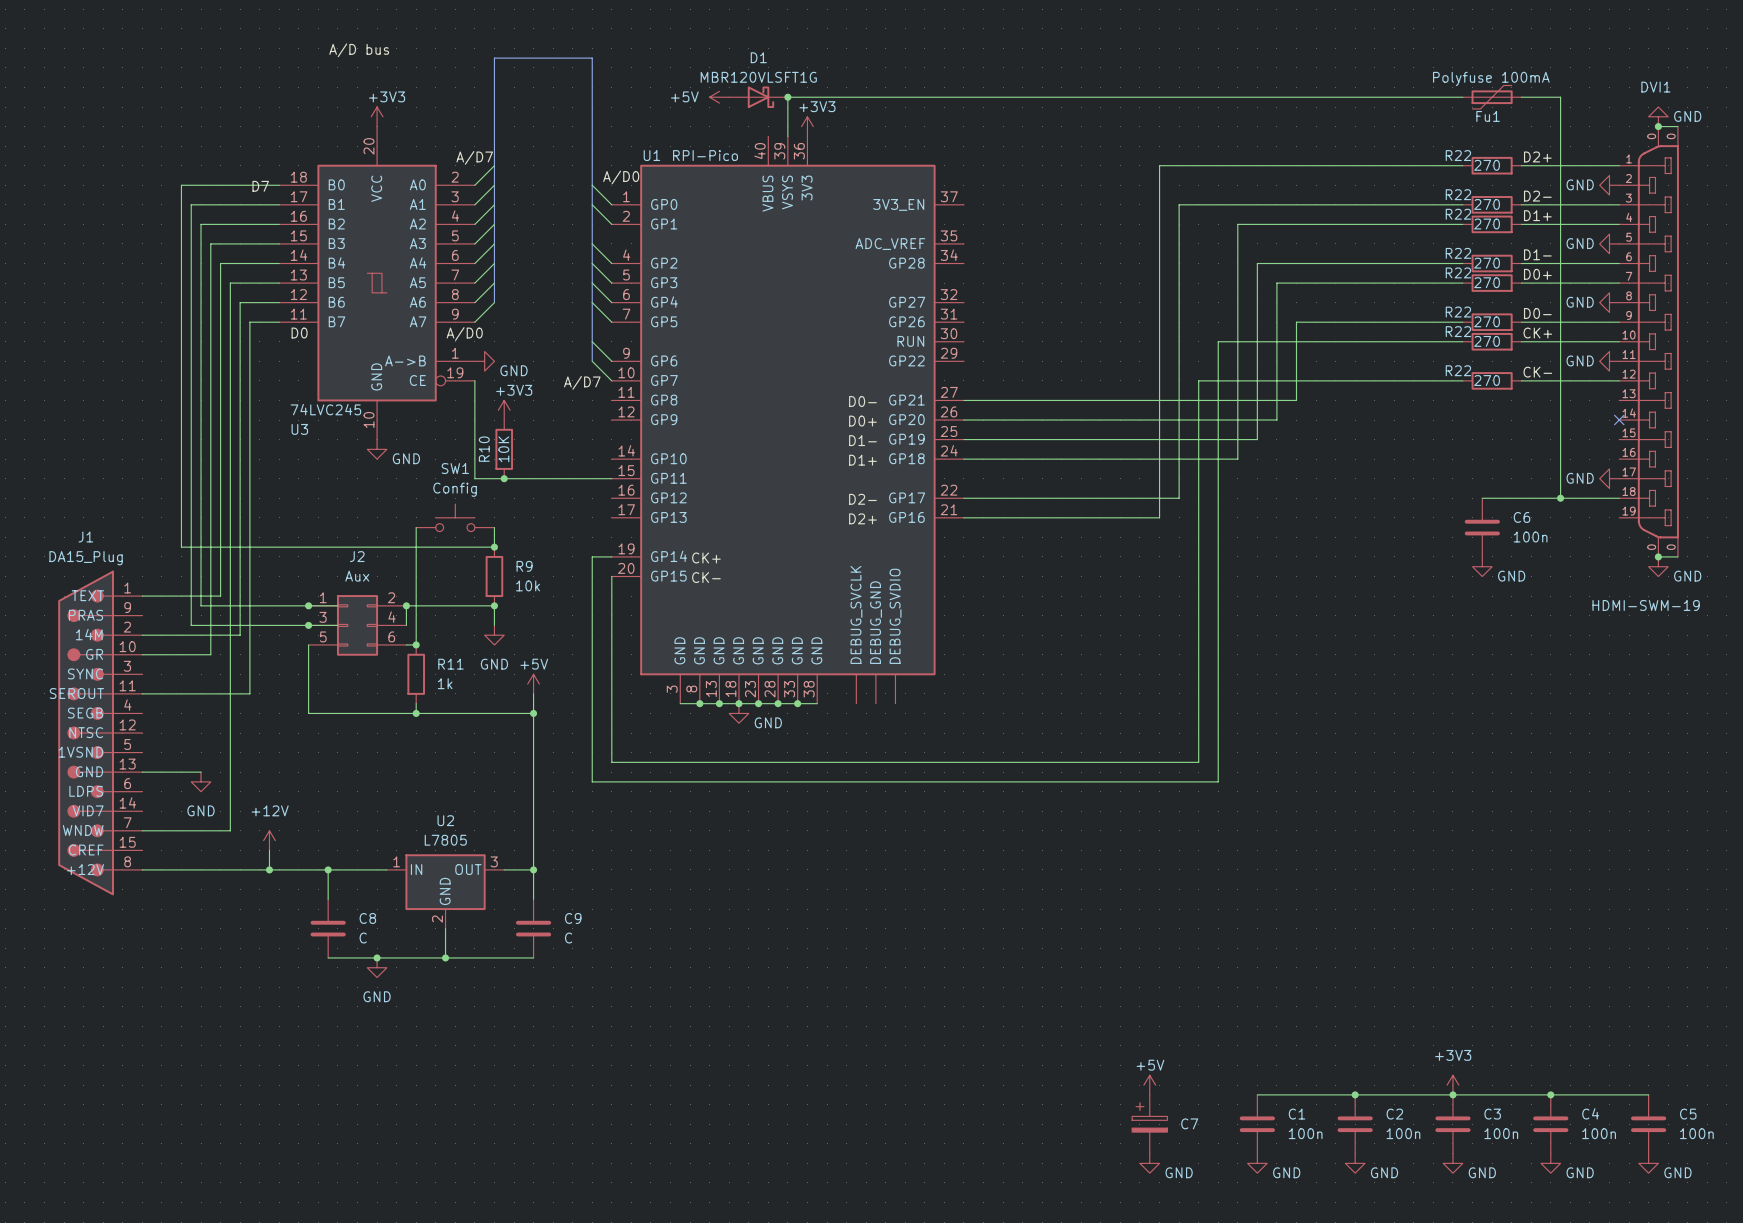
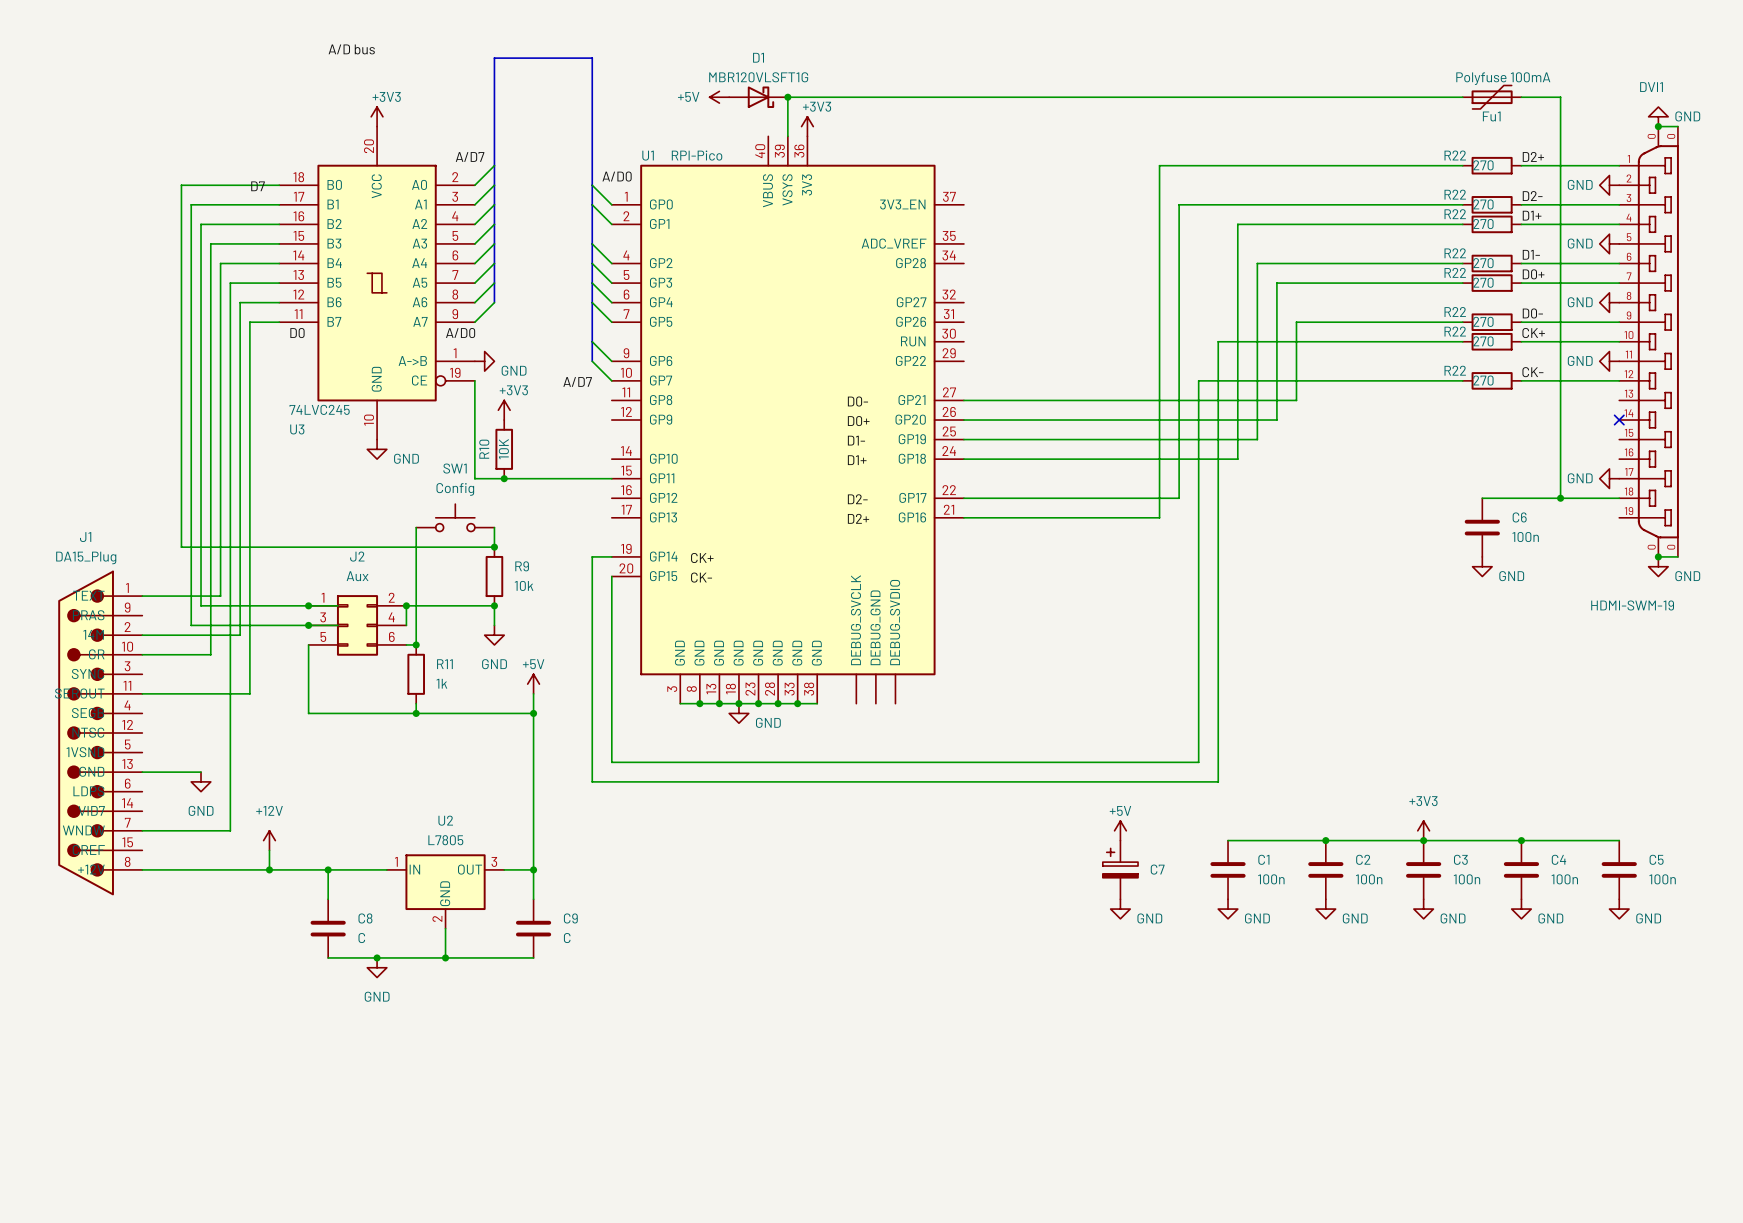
power symbol: none -> +5V (1120, 830)
power symbol: none -> +3V3 (1423, 830)
wire: none -> (1228, 840) (1619, 840)
junction: none -> (1325, 840)
junction: none -> (1423, 840)
junction: none -> (1521, 840)
power symbol: none -> GND (1120, 909)
power symbol: none -> GND (1228, 909)
power symbol: none -> GND (1325, 909)
power symbol: none -> GND (1423, 909)
power symbol: none -> GND (1521, 909)
power symbol: none -> GND (1619, 909)
power symbol: +5V (1149, 1085) -> none
power symbol: +3V3 (1452, 1085) -> none
wire: (1257, 1094) (1648, 1094) -> none
junction: (1355, 1094) -> none
junction: (1452, 1094) -> none
junction: (1550, 1094) -> none
C7 position: (1149, 1124) -> (1120, 869)
C1 position: (1257, 1124) -> (1228, 869)
C2 position: (1355, 1124) -> (1325, 869)
C3 position: (1452, 1124) -> (1423, 869)
C4 position: (1550, 1124) -> (1521, 869)
C5 position: (1648, 1124) -> (1619, 869)
power symbol: GND (1149, 1163) -> none
power symbol: GND (1257, 1163) -> none
power symbol: GND (1355, 1163) -> none
power symbol: GND (1452, 1163) -> none
power symbol: GND (1550, 1163) -> none
power symbol: GND (1648, 1163) -> none

